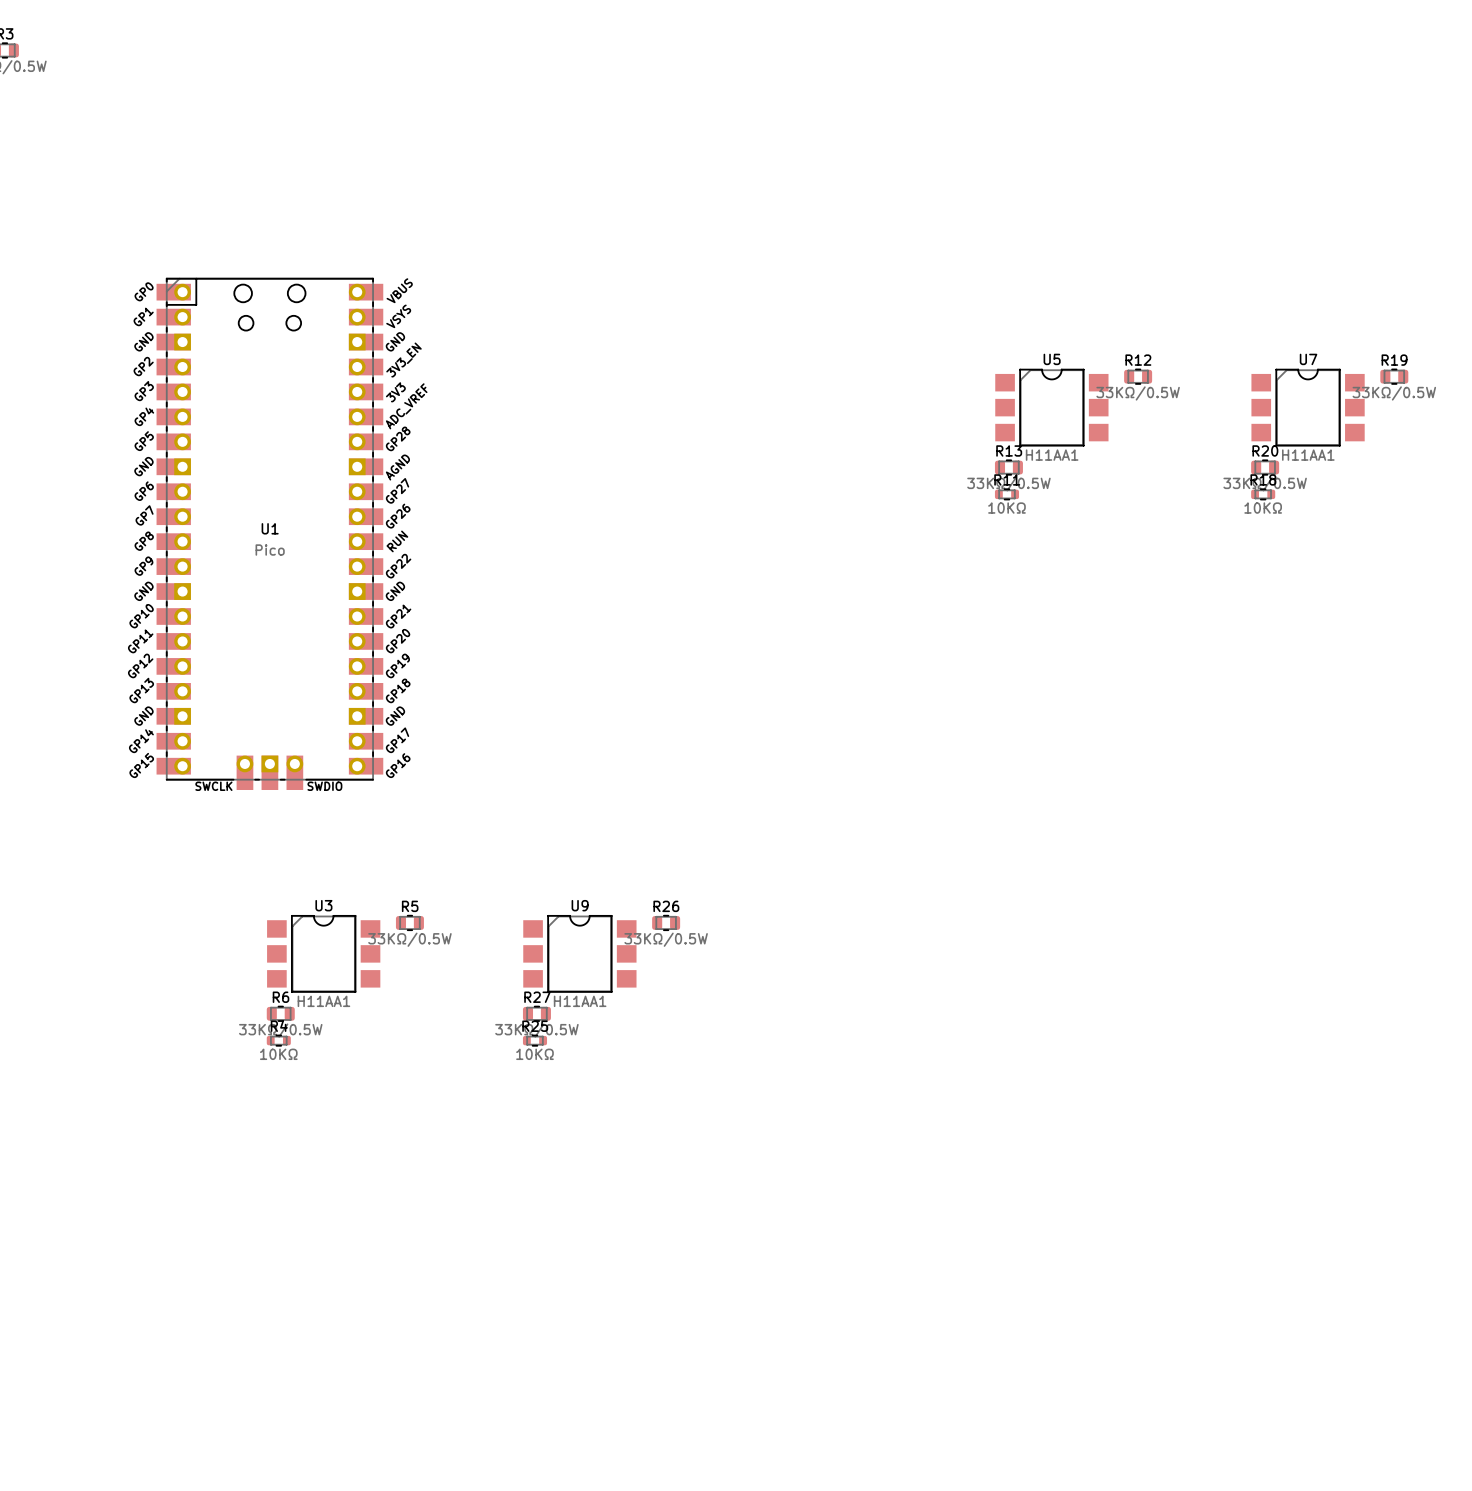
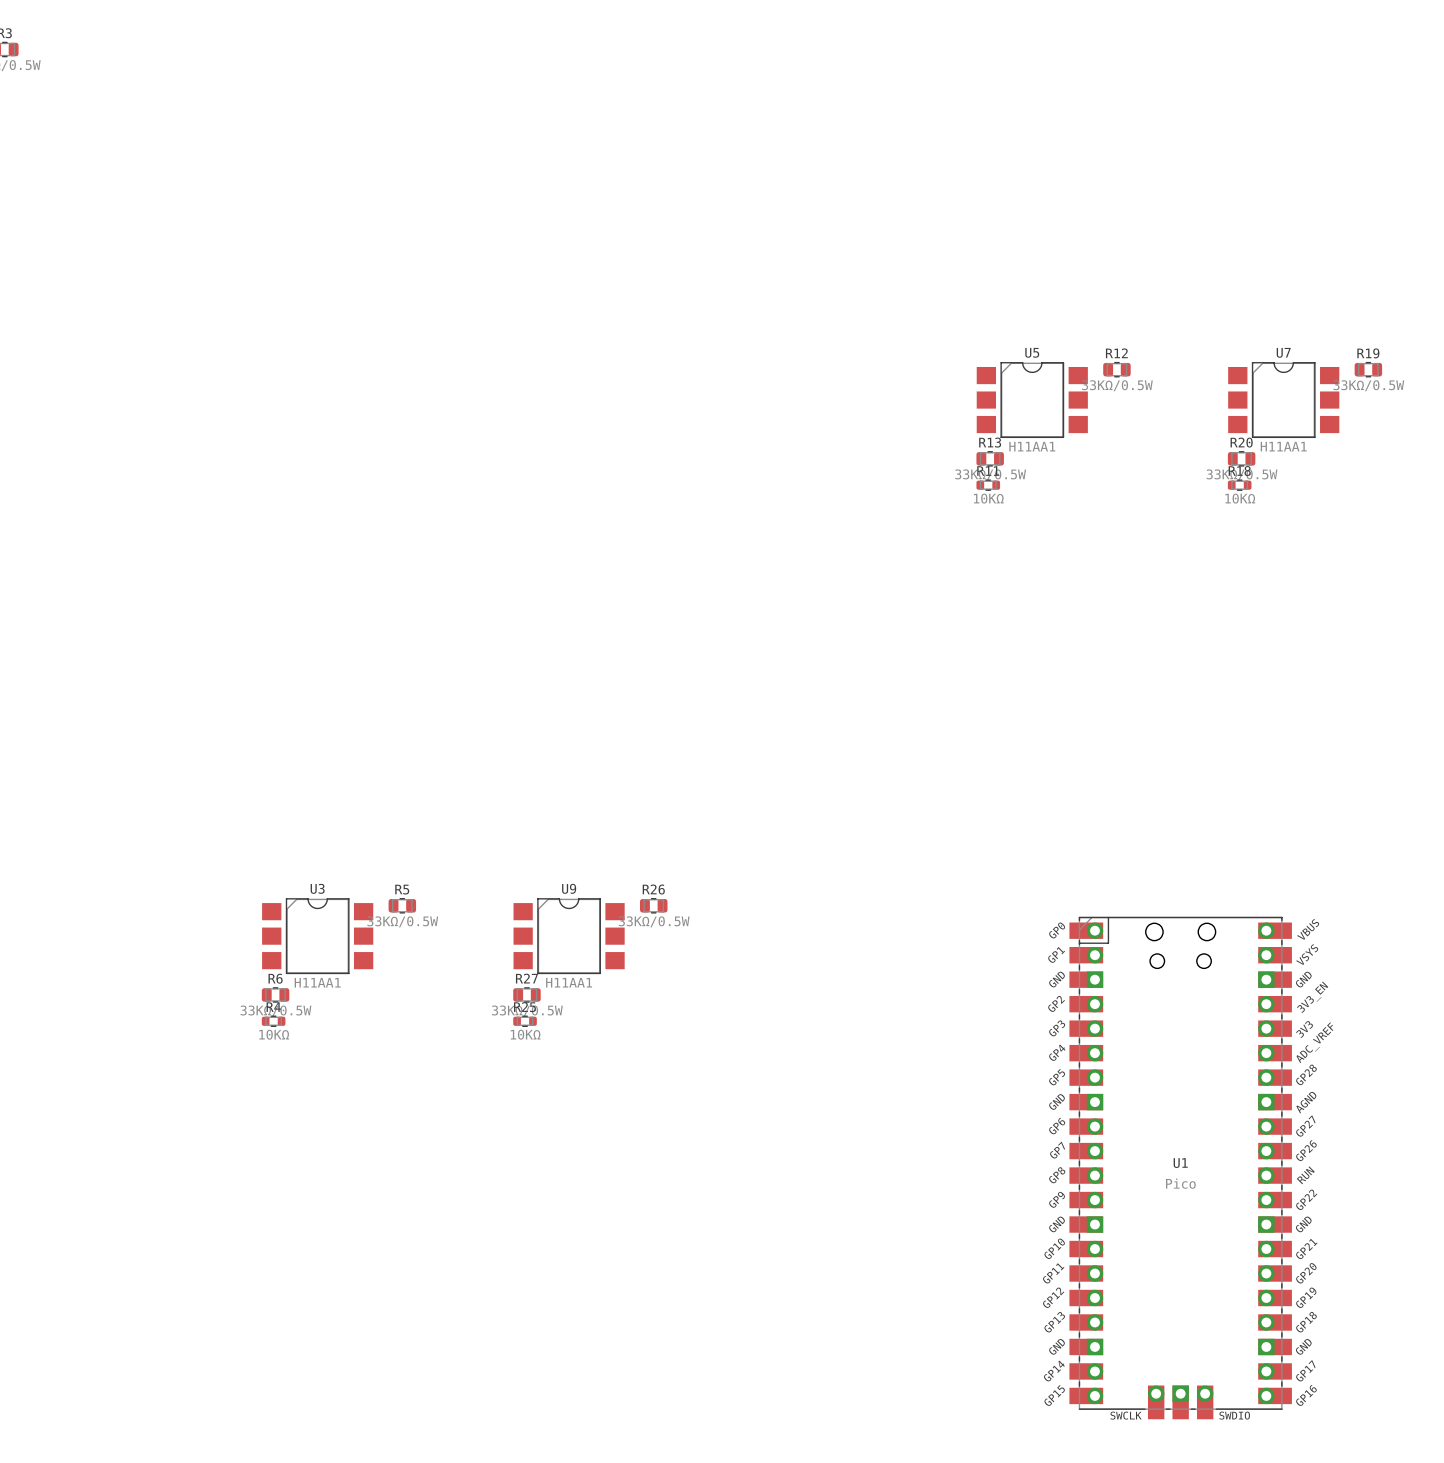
U1 position: (269, 534) -> (1180, 1168)

